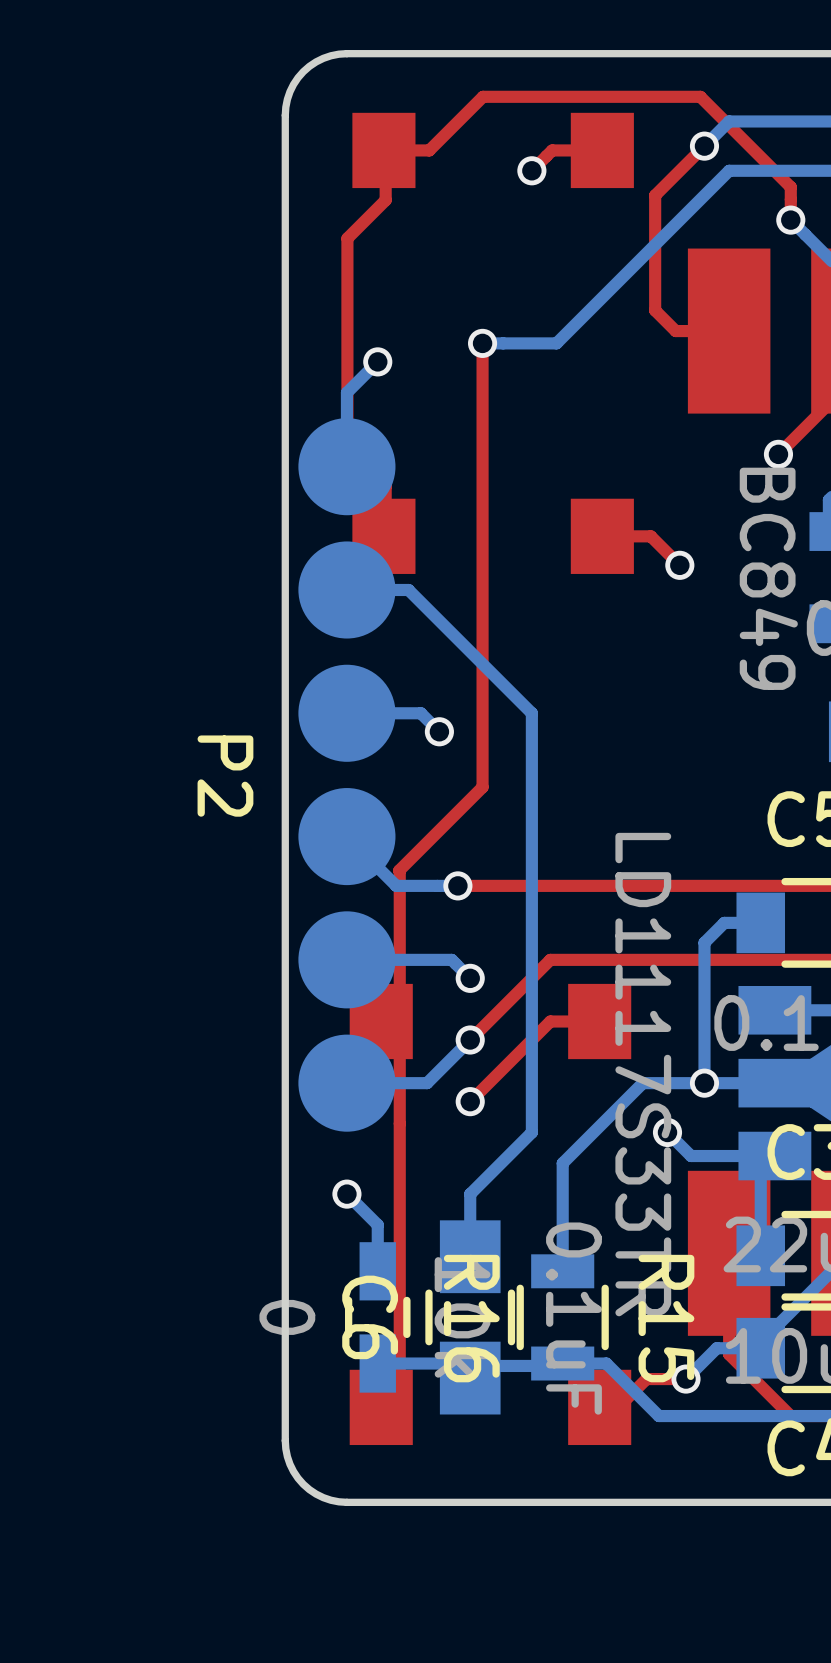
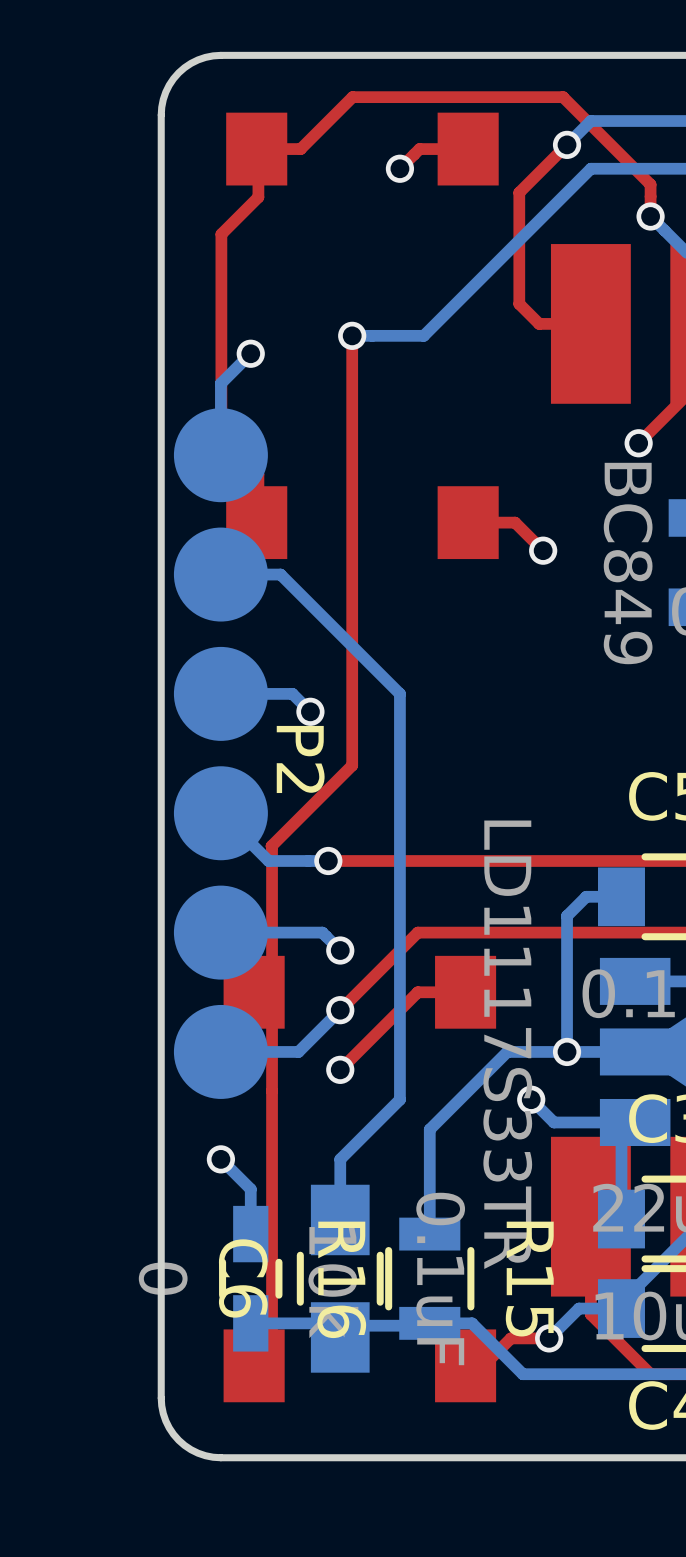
P2 name position: P2 (225, 776) -> P2 (300, 759)

